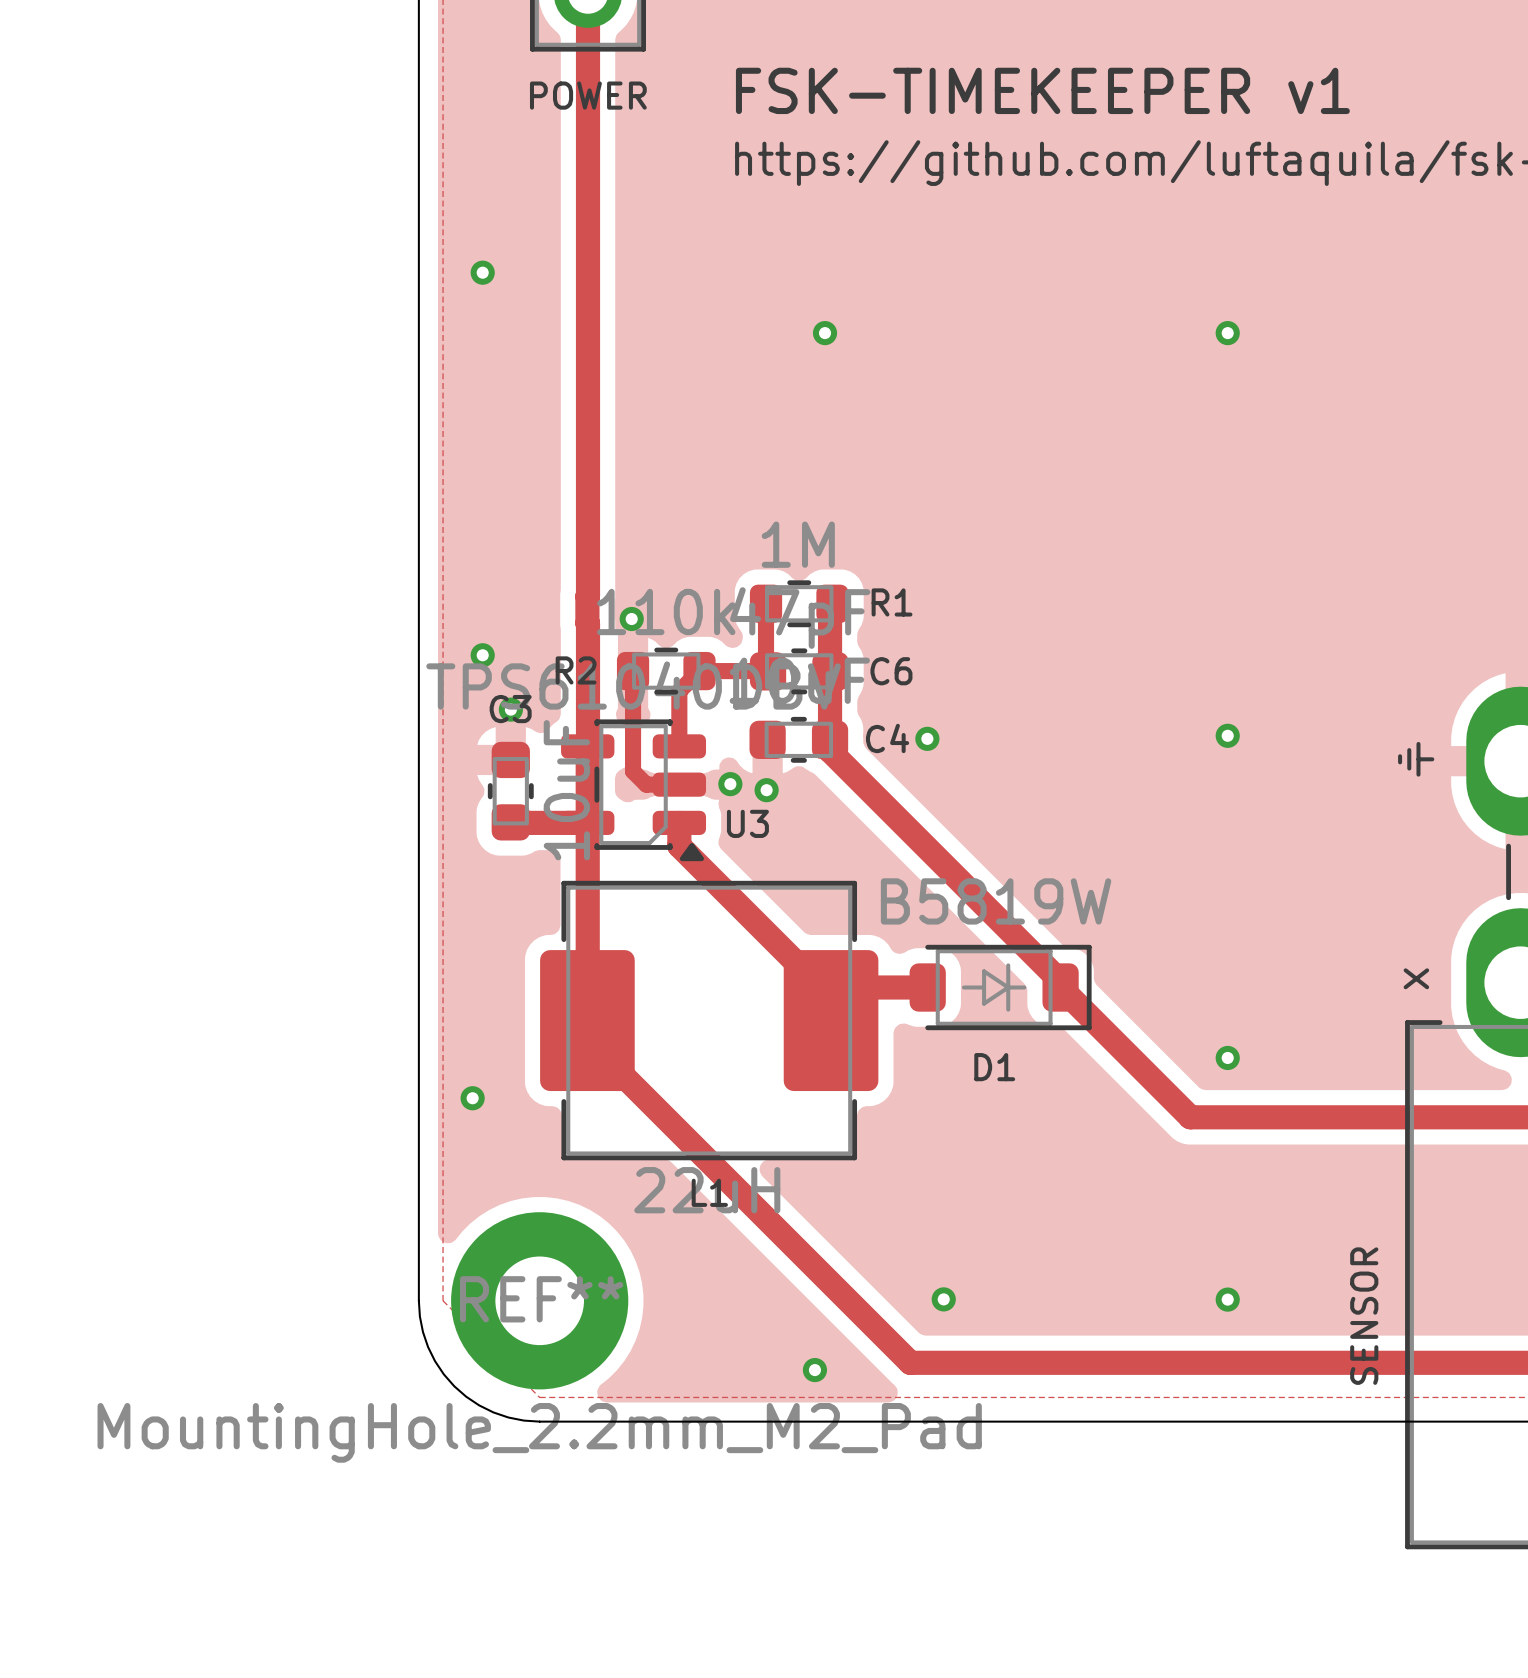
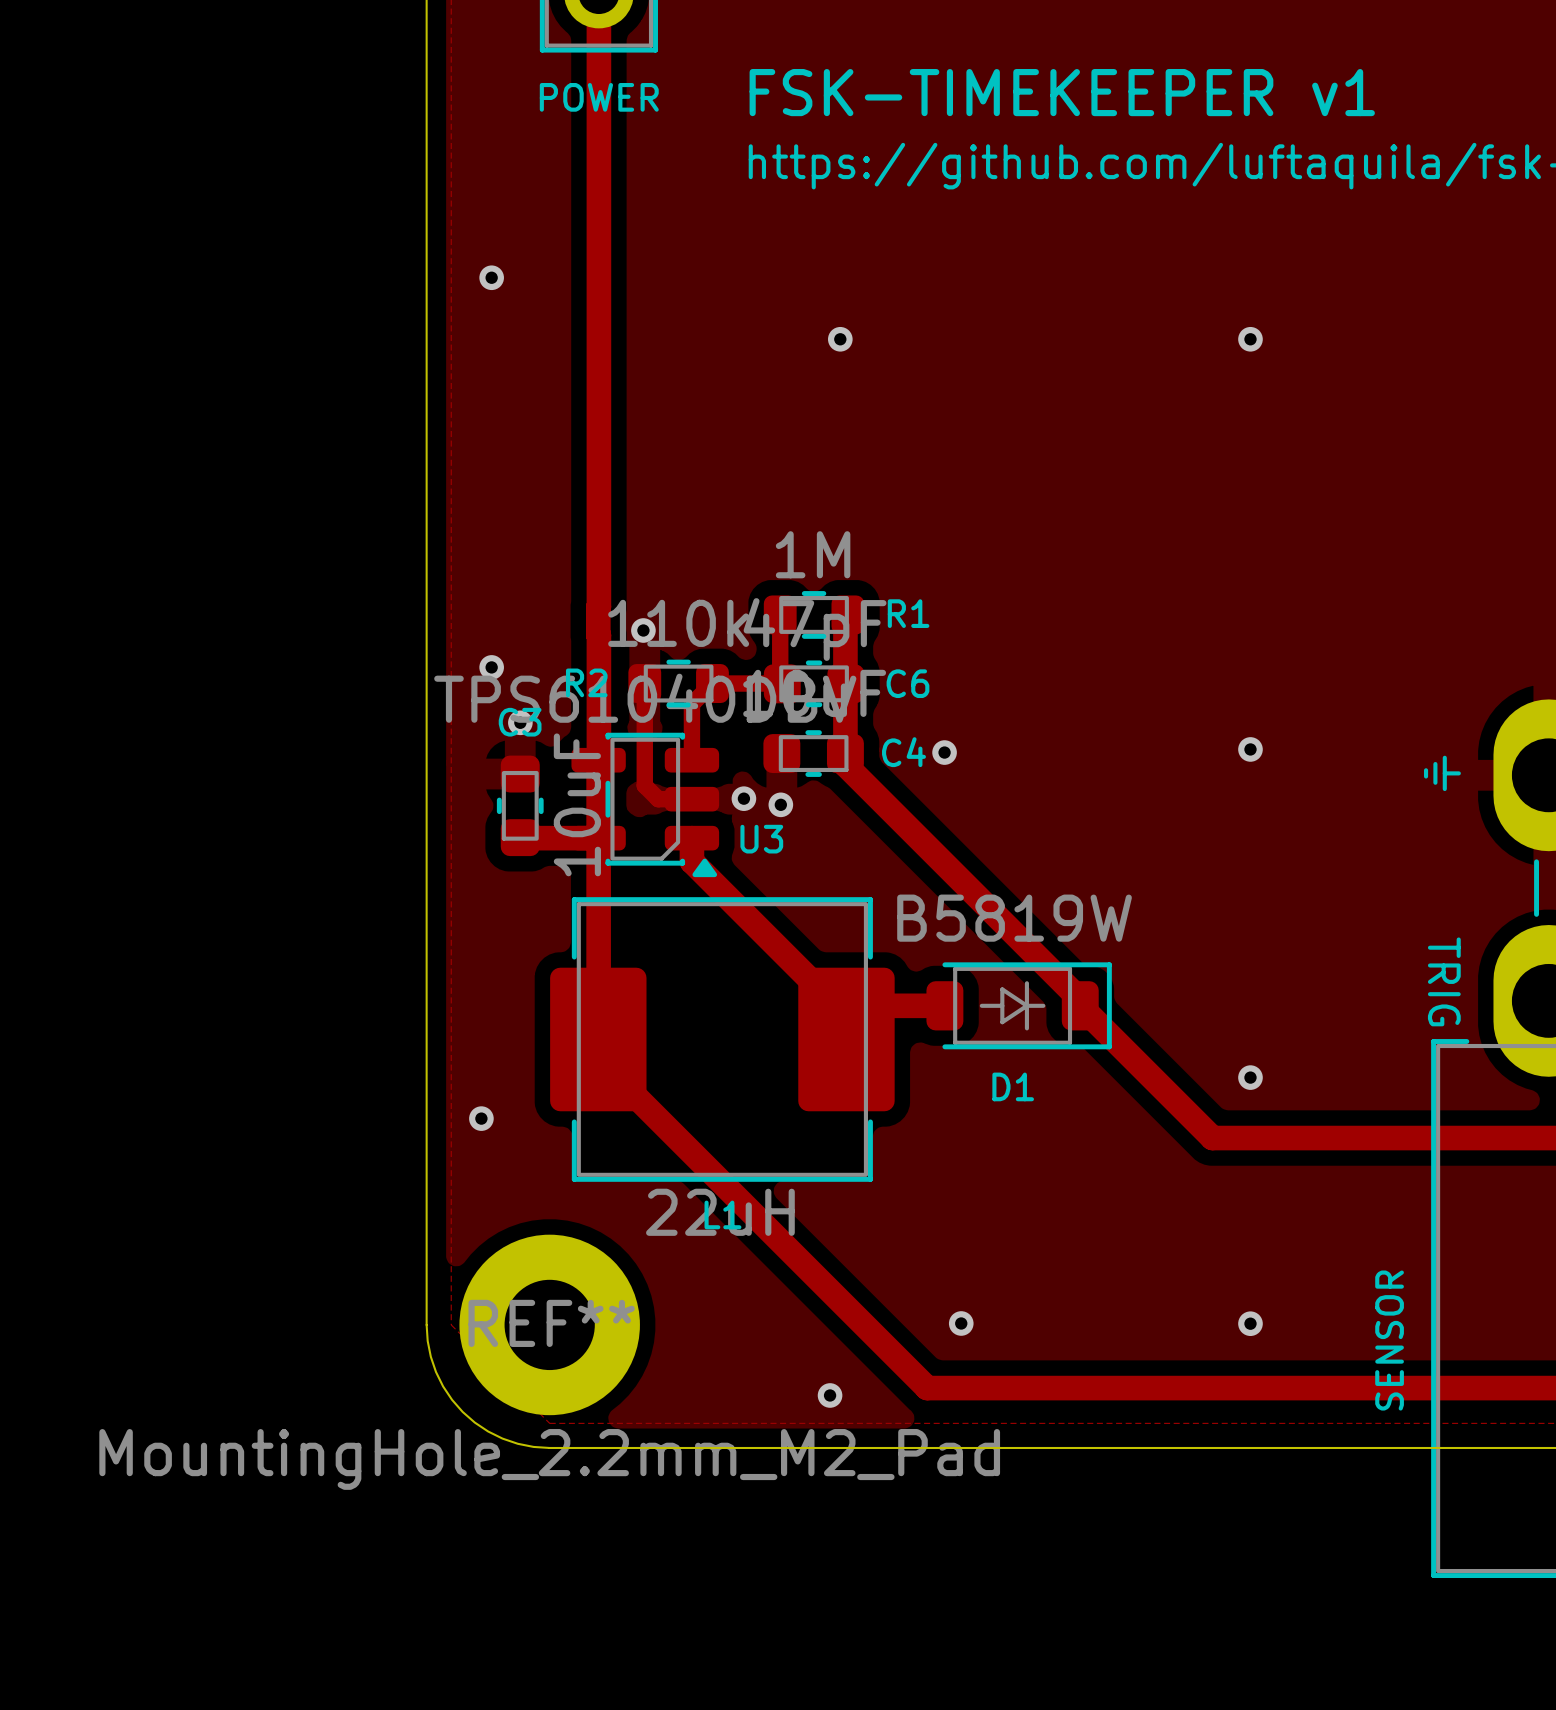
text: x (1416, 978) -> TRIG (1444, 981)

